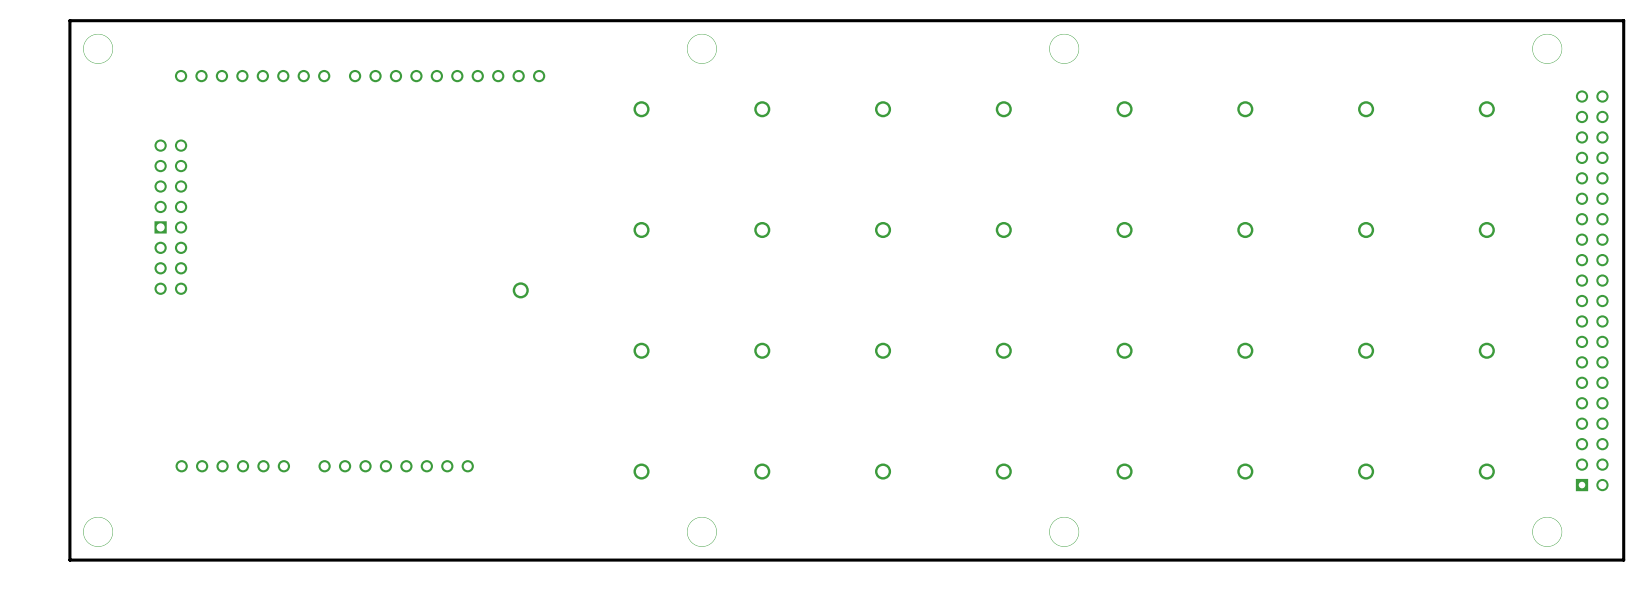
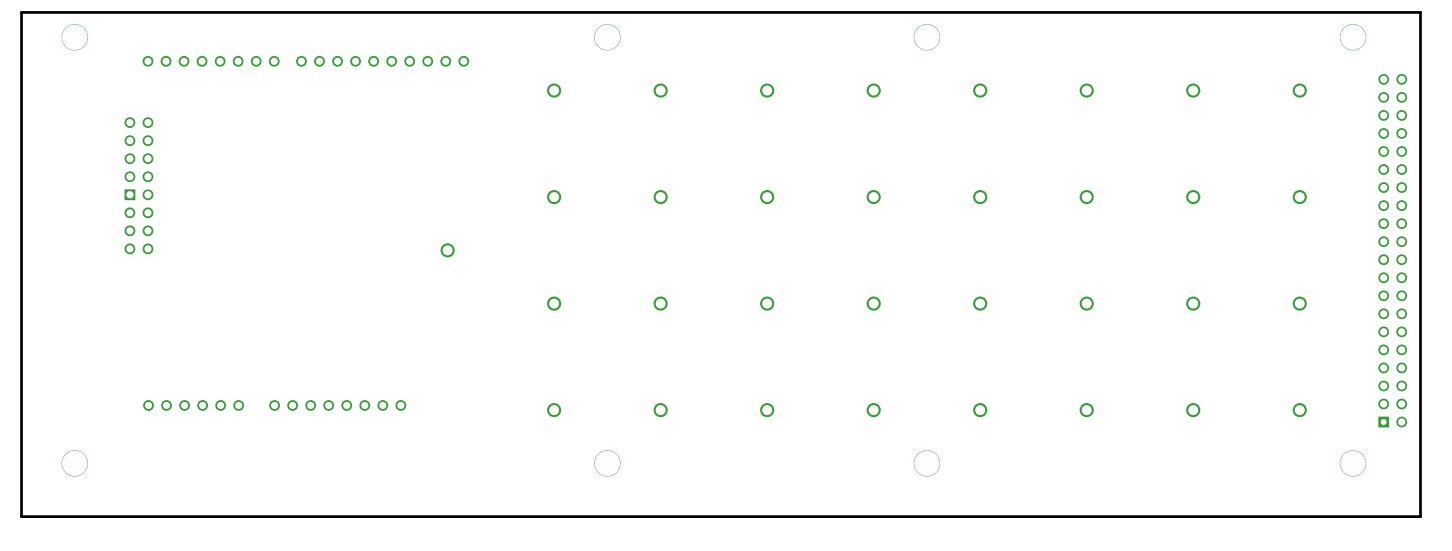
board edge: (69, 20) (69, 560) (1623, 560) -> (49, 12) (21, 12) (21, 516) (1420, 516) (1420, 488)

